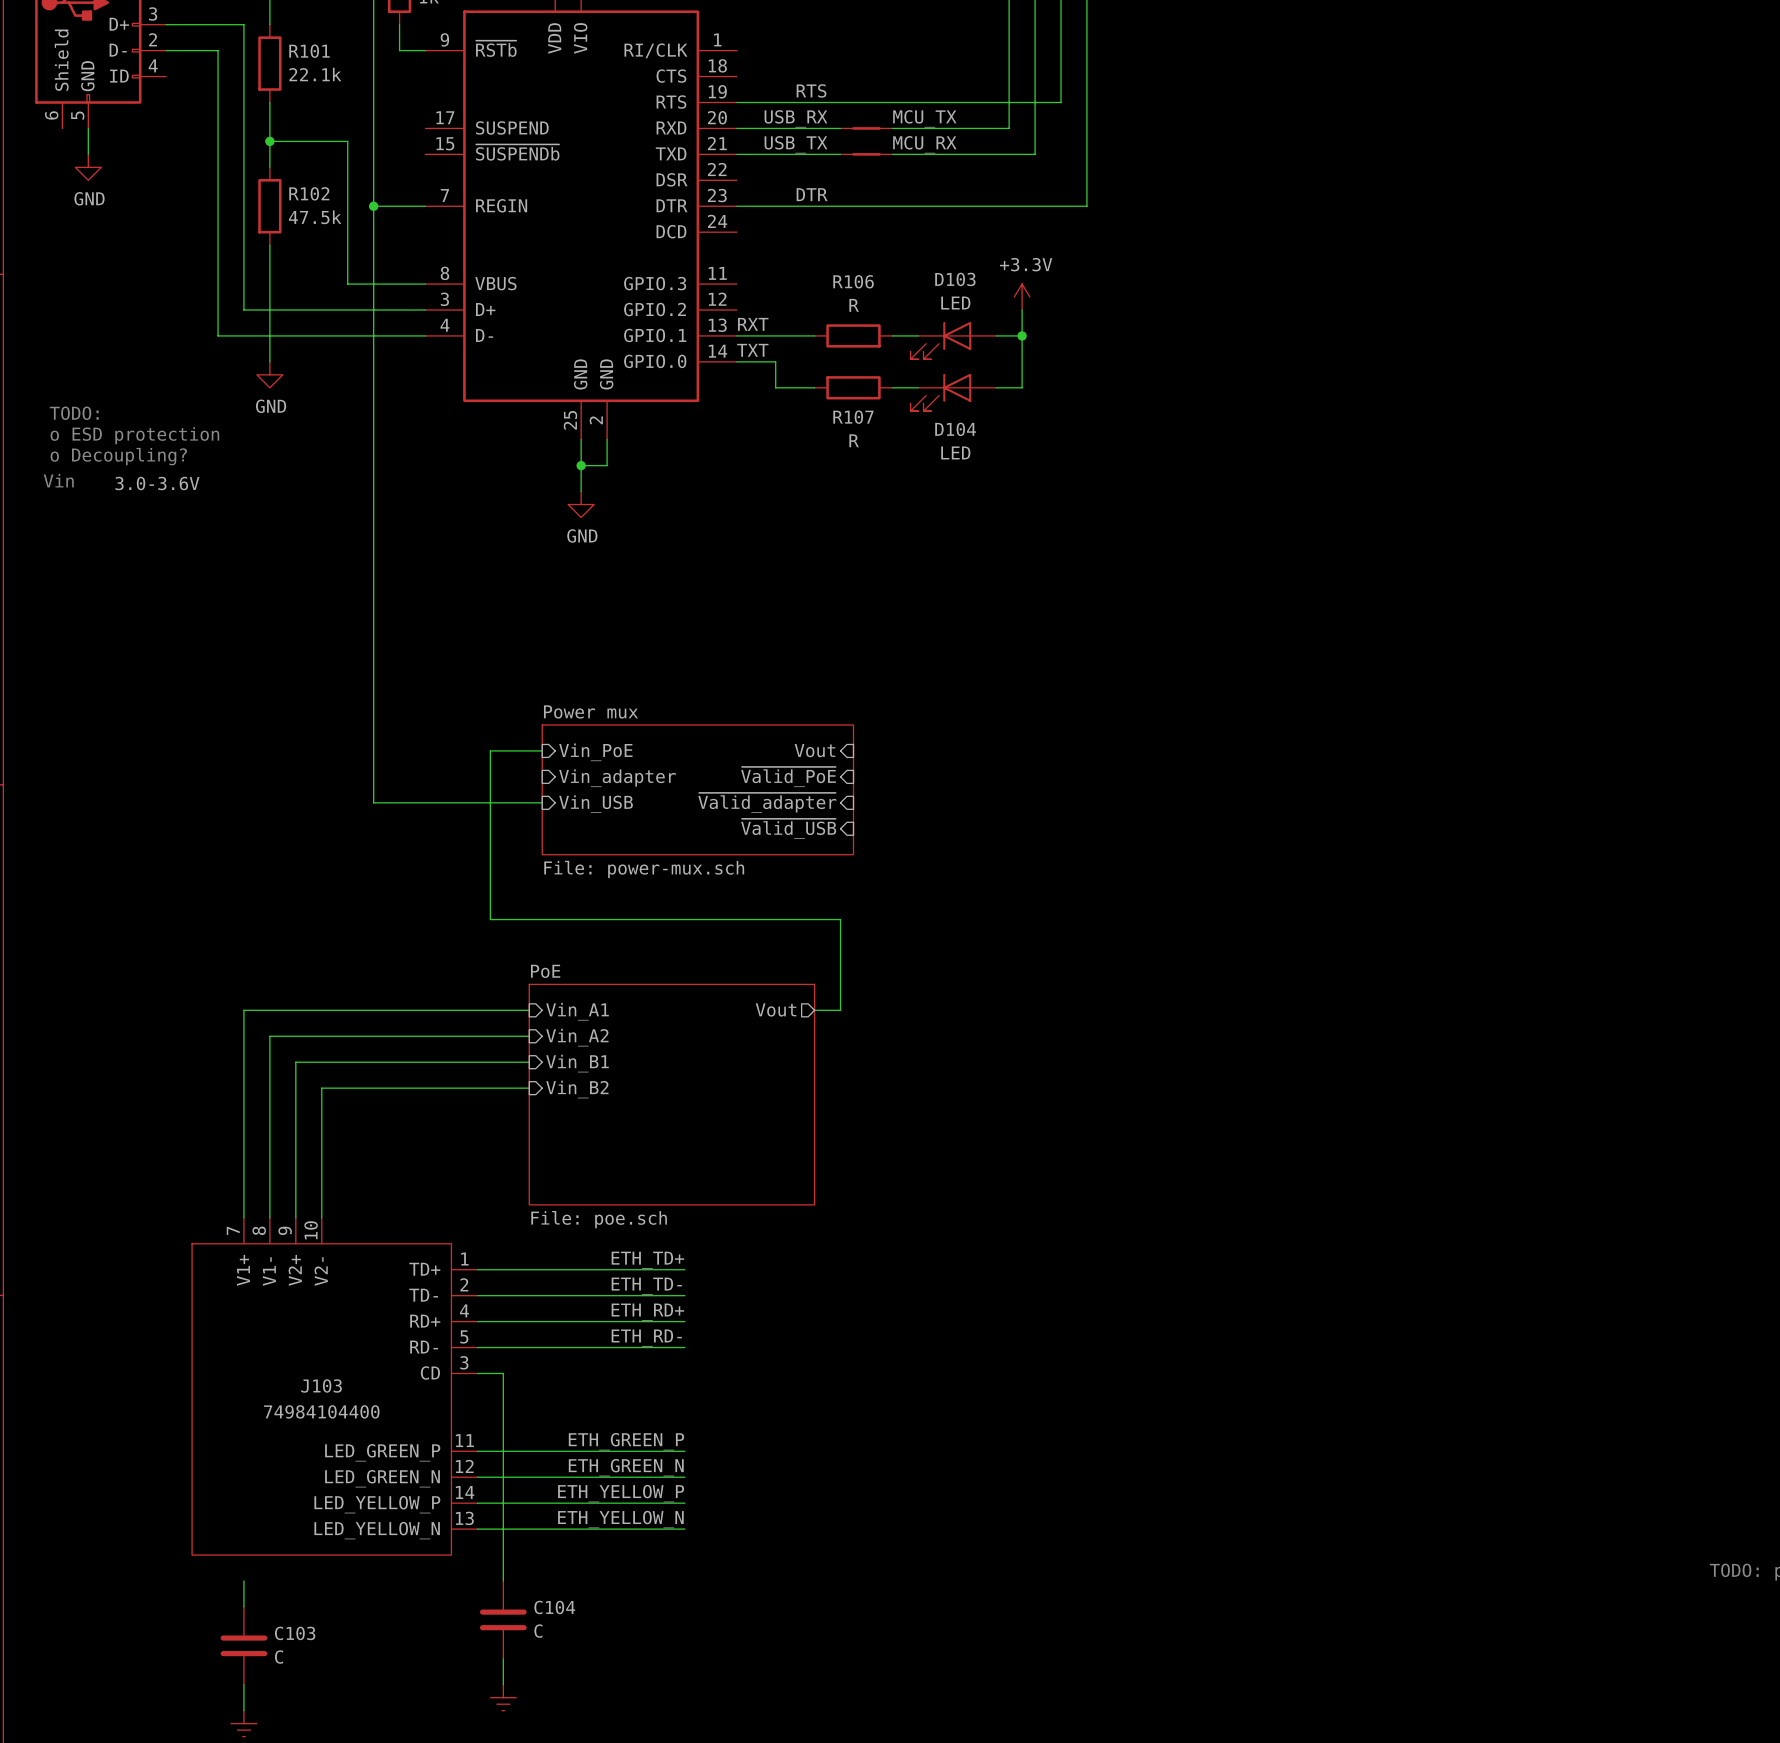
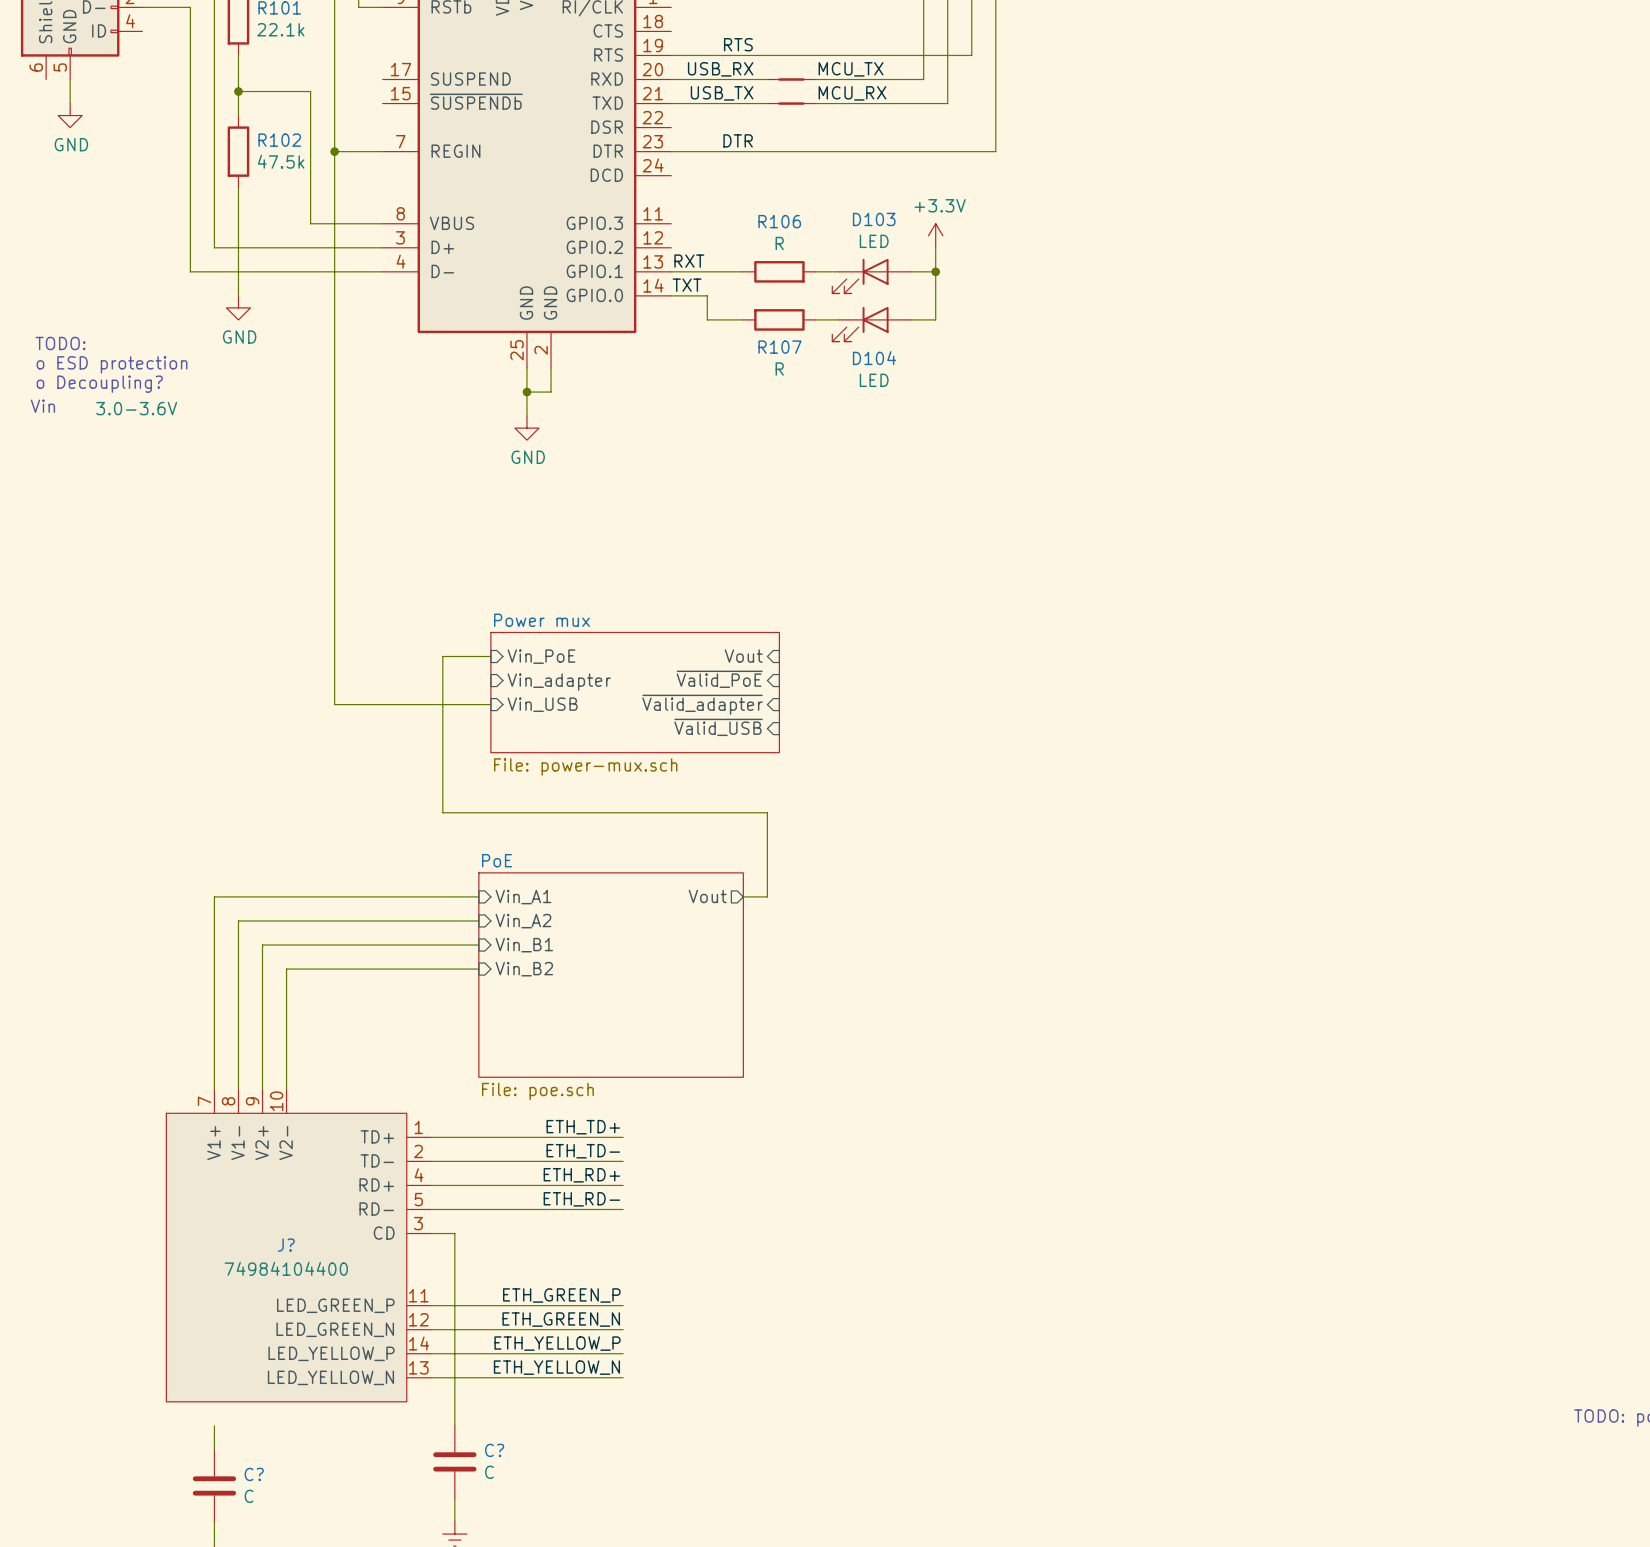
J103 name: J103 (321, 1385) -> J? (286, 1245)
C104 name: C104 (554, 1607) -> C? (494, 1450)
C103 name: C103 (295, 1633) -> C? (254, 1474)

